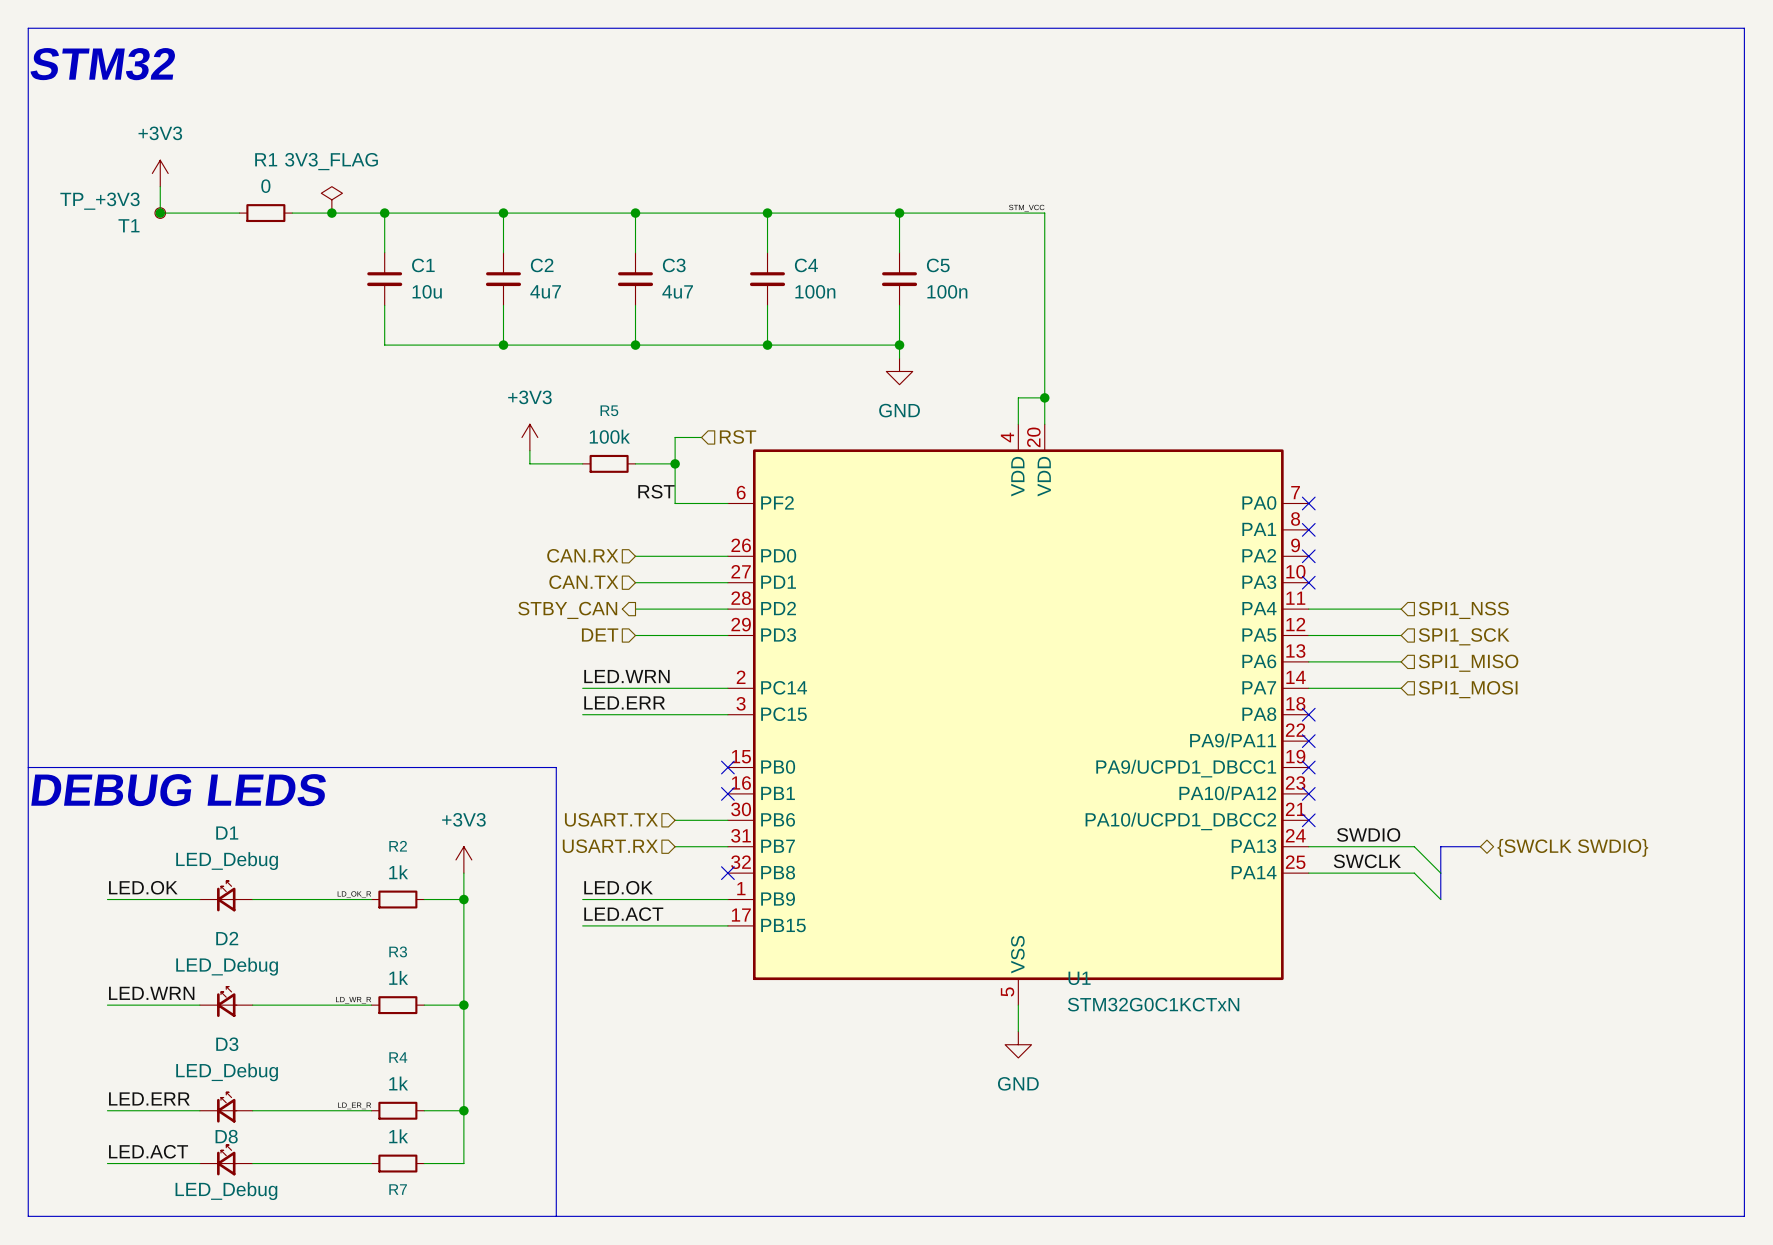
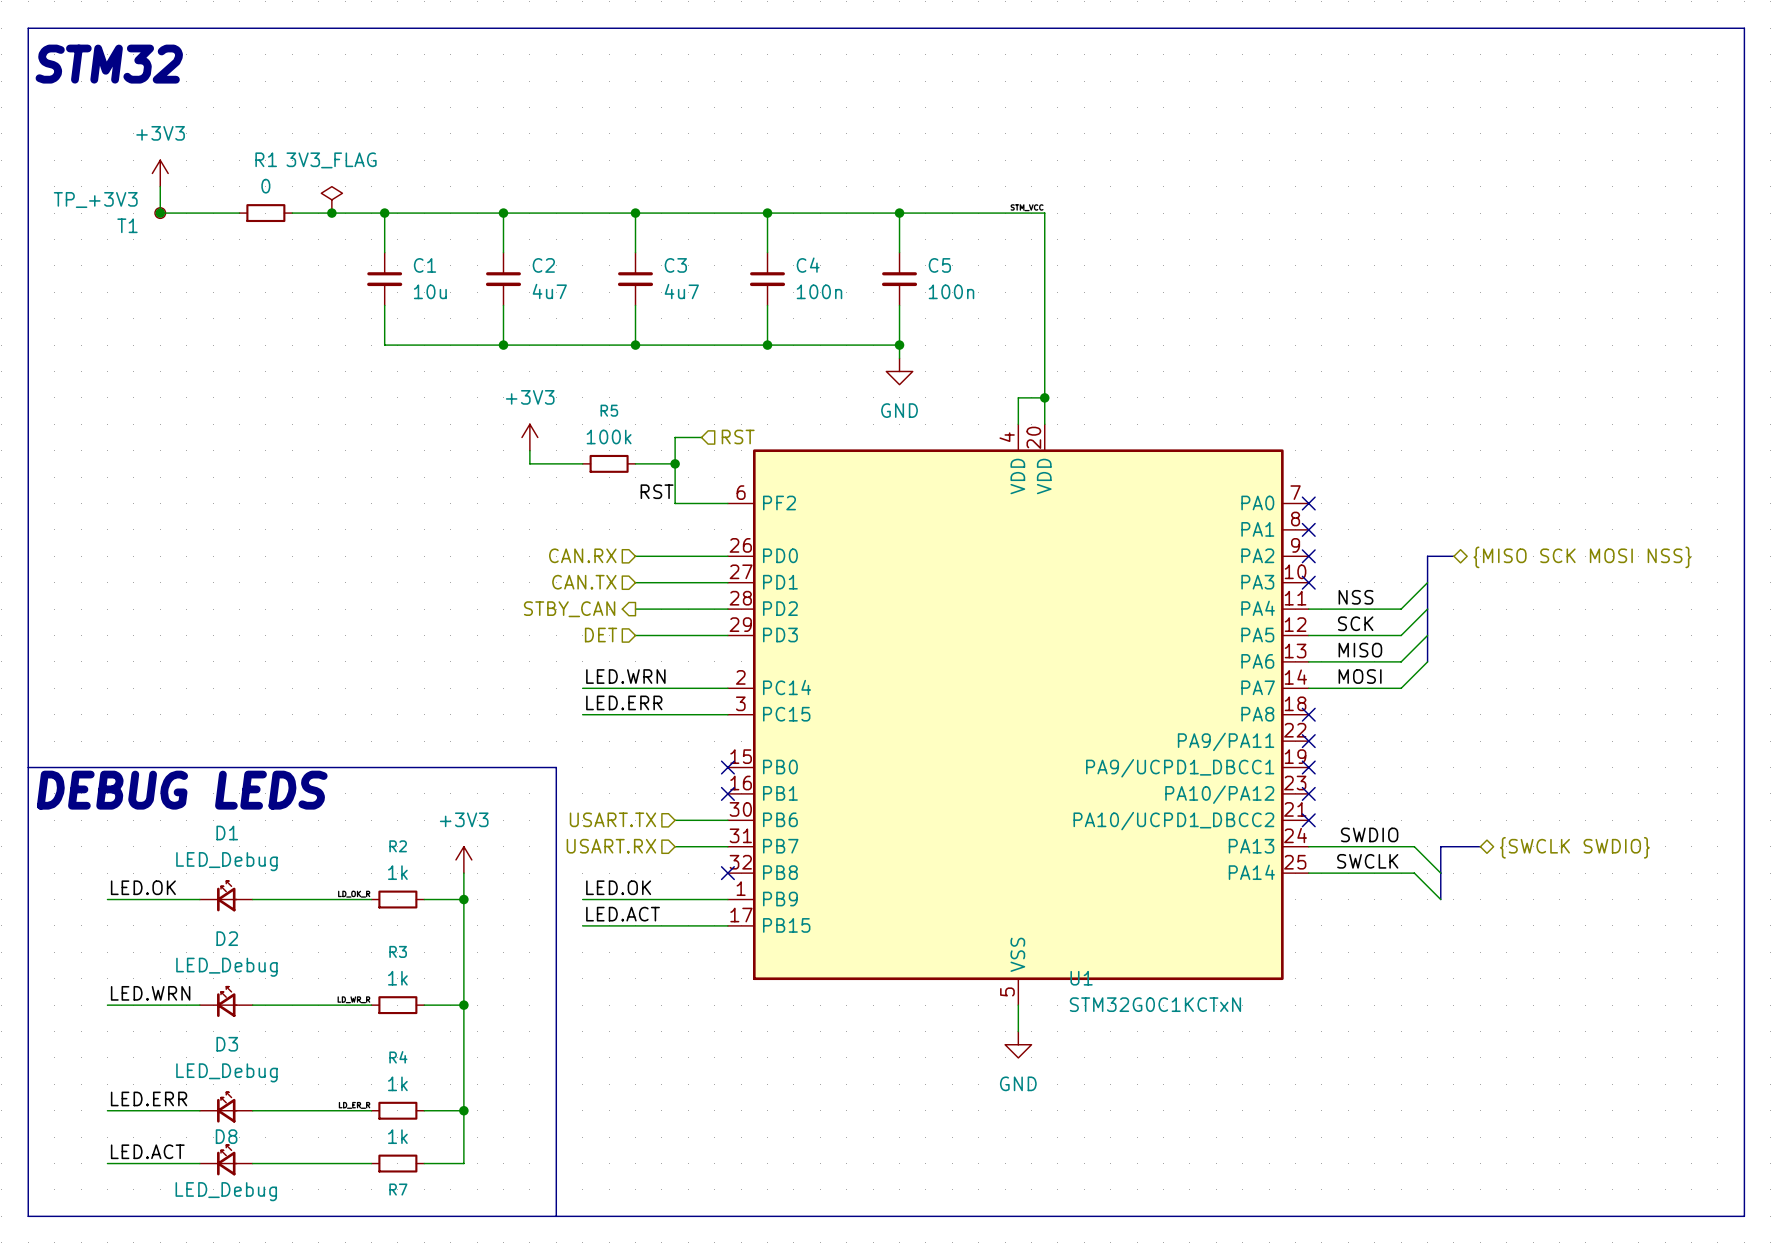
bus: none -> (1453, 556) (1427, 556) (1427, 661)
hierarchical label: none -> {MISO SCK MOSI NSS} (1582, 557)
wire: none -> (1427, 582) (1401, 609)
label: none -> NSS (1356, 597)
wire: none -> (1427, 609) (1401, 635)
hierarchical label: SPI1_NSS (1463, 610) -> none
label: none -> SCK (1355, 623)
wire: none -> (1427, 635) (1401, 661)
hierarchical label: SPI1_SCK (1464, 636) -> none
label: none -> MISO (1360, 650)
wire: none -> (1427, 661) (1401, 688)
hierarchical label: SPI1_MISO (1468, 663) -> none
label: none -> MOSI (1360, 676)
hierarchical label: SPI1_MOSI (1468, 689) -> none

